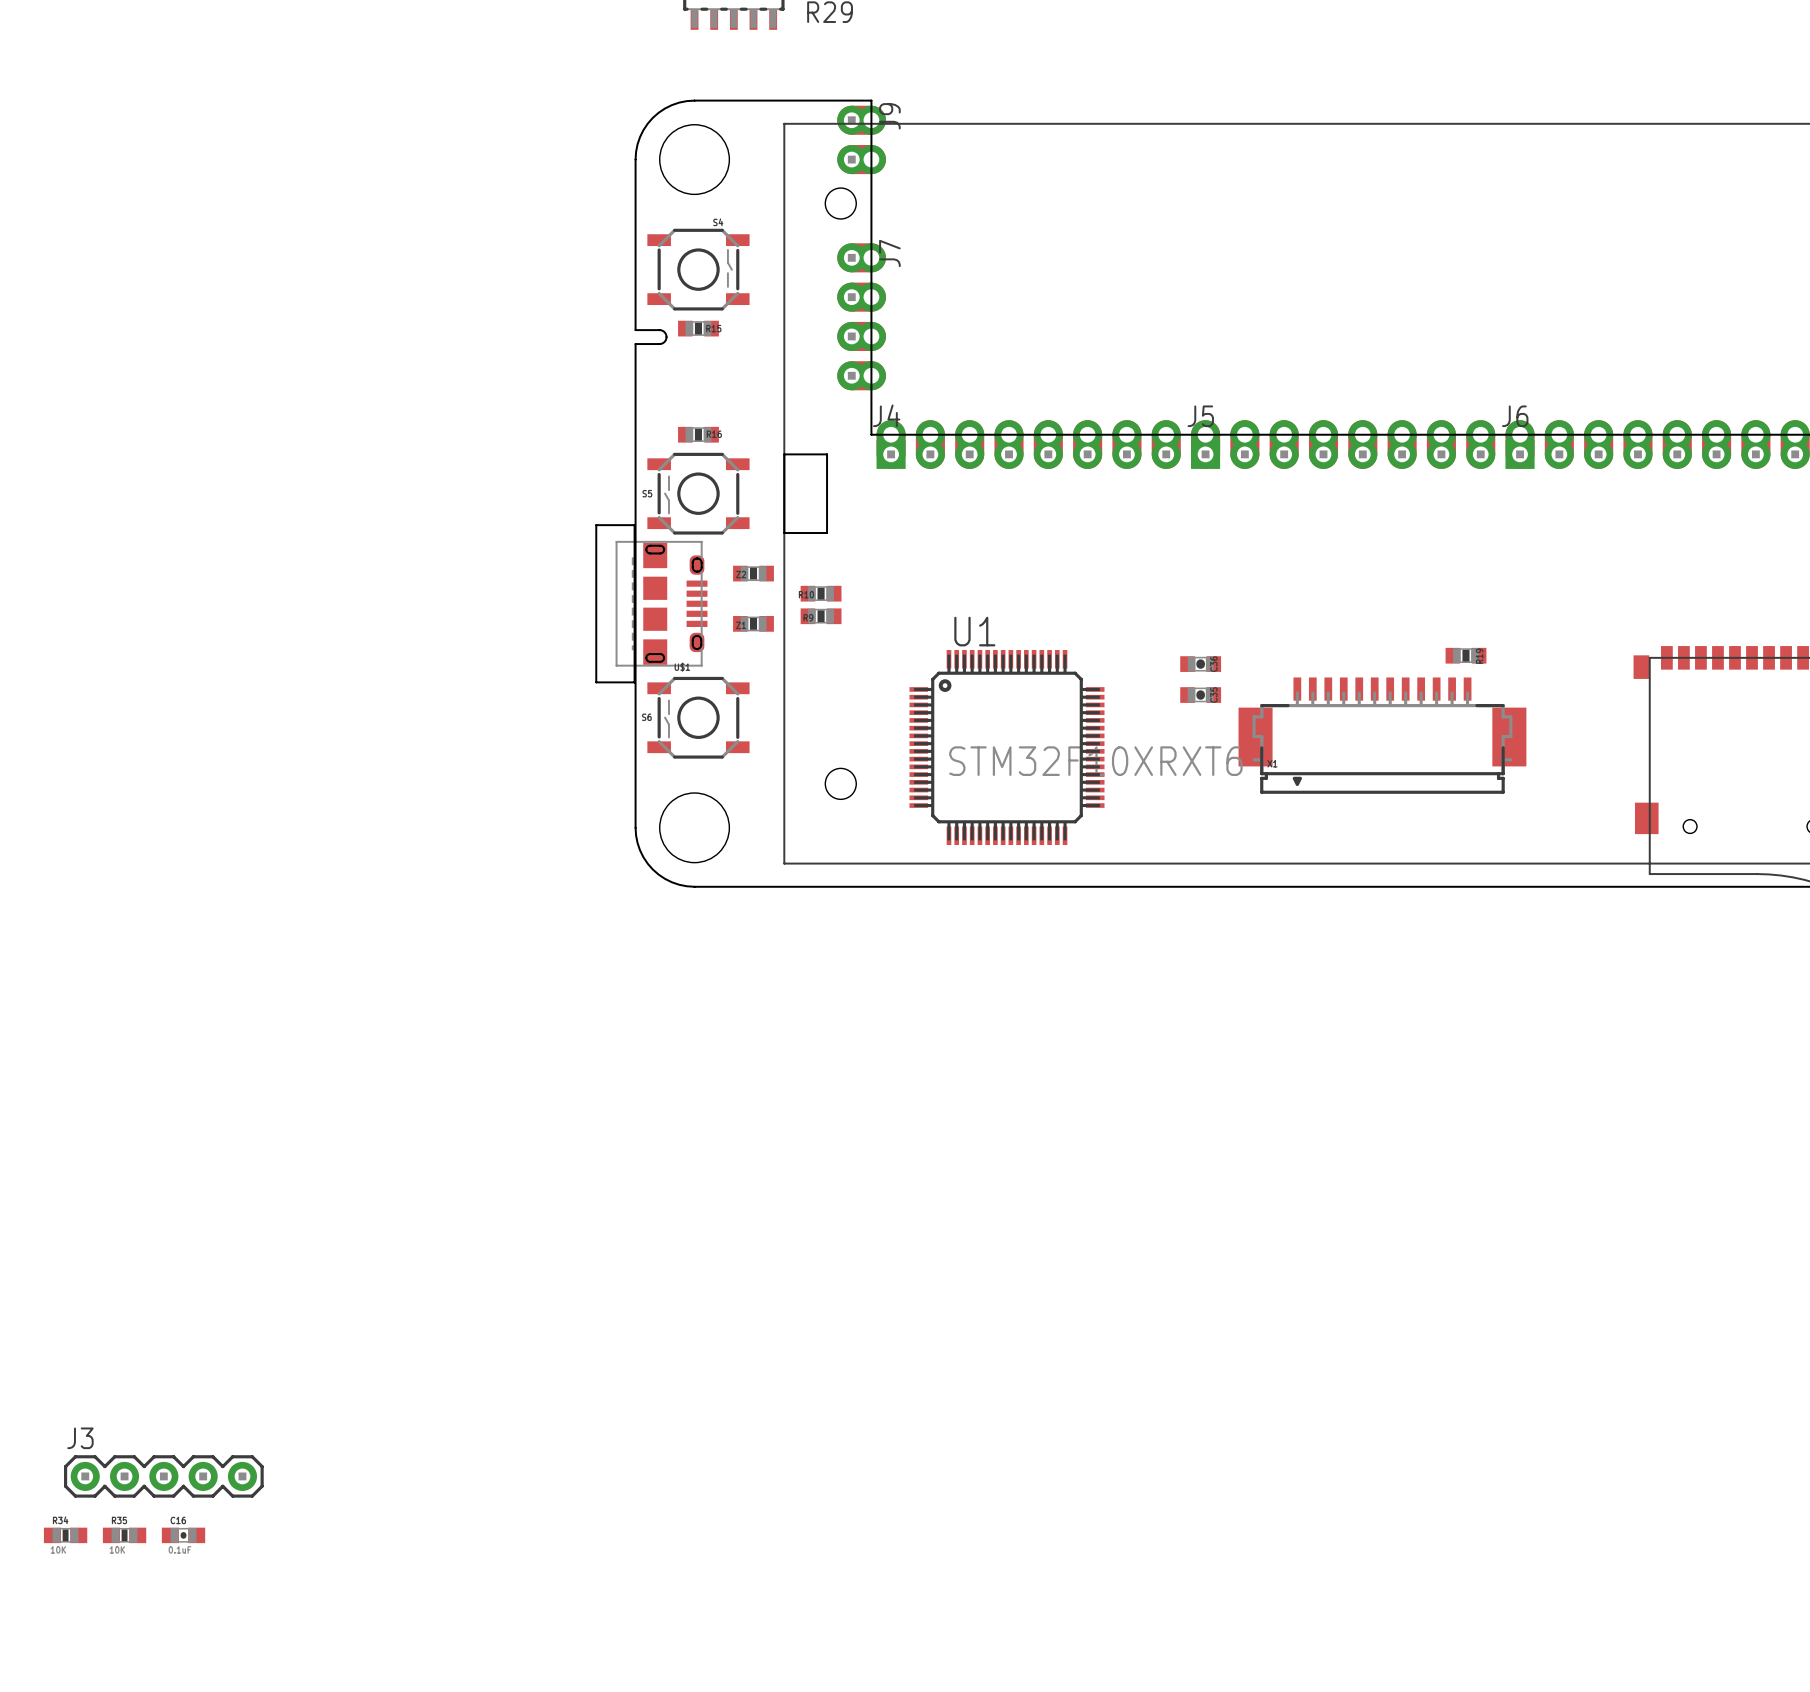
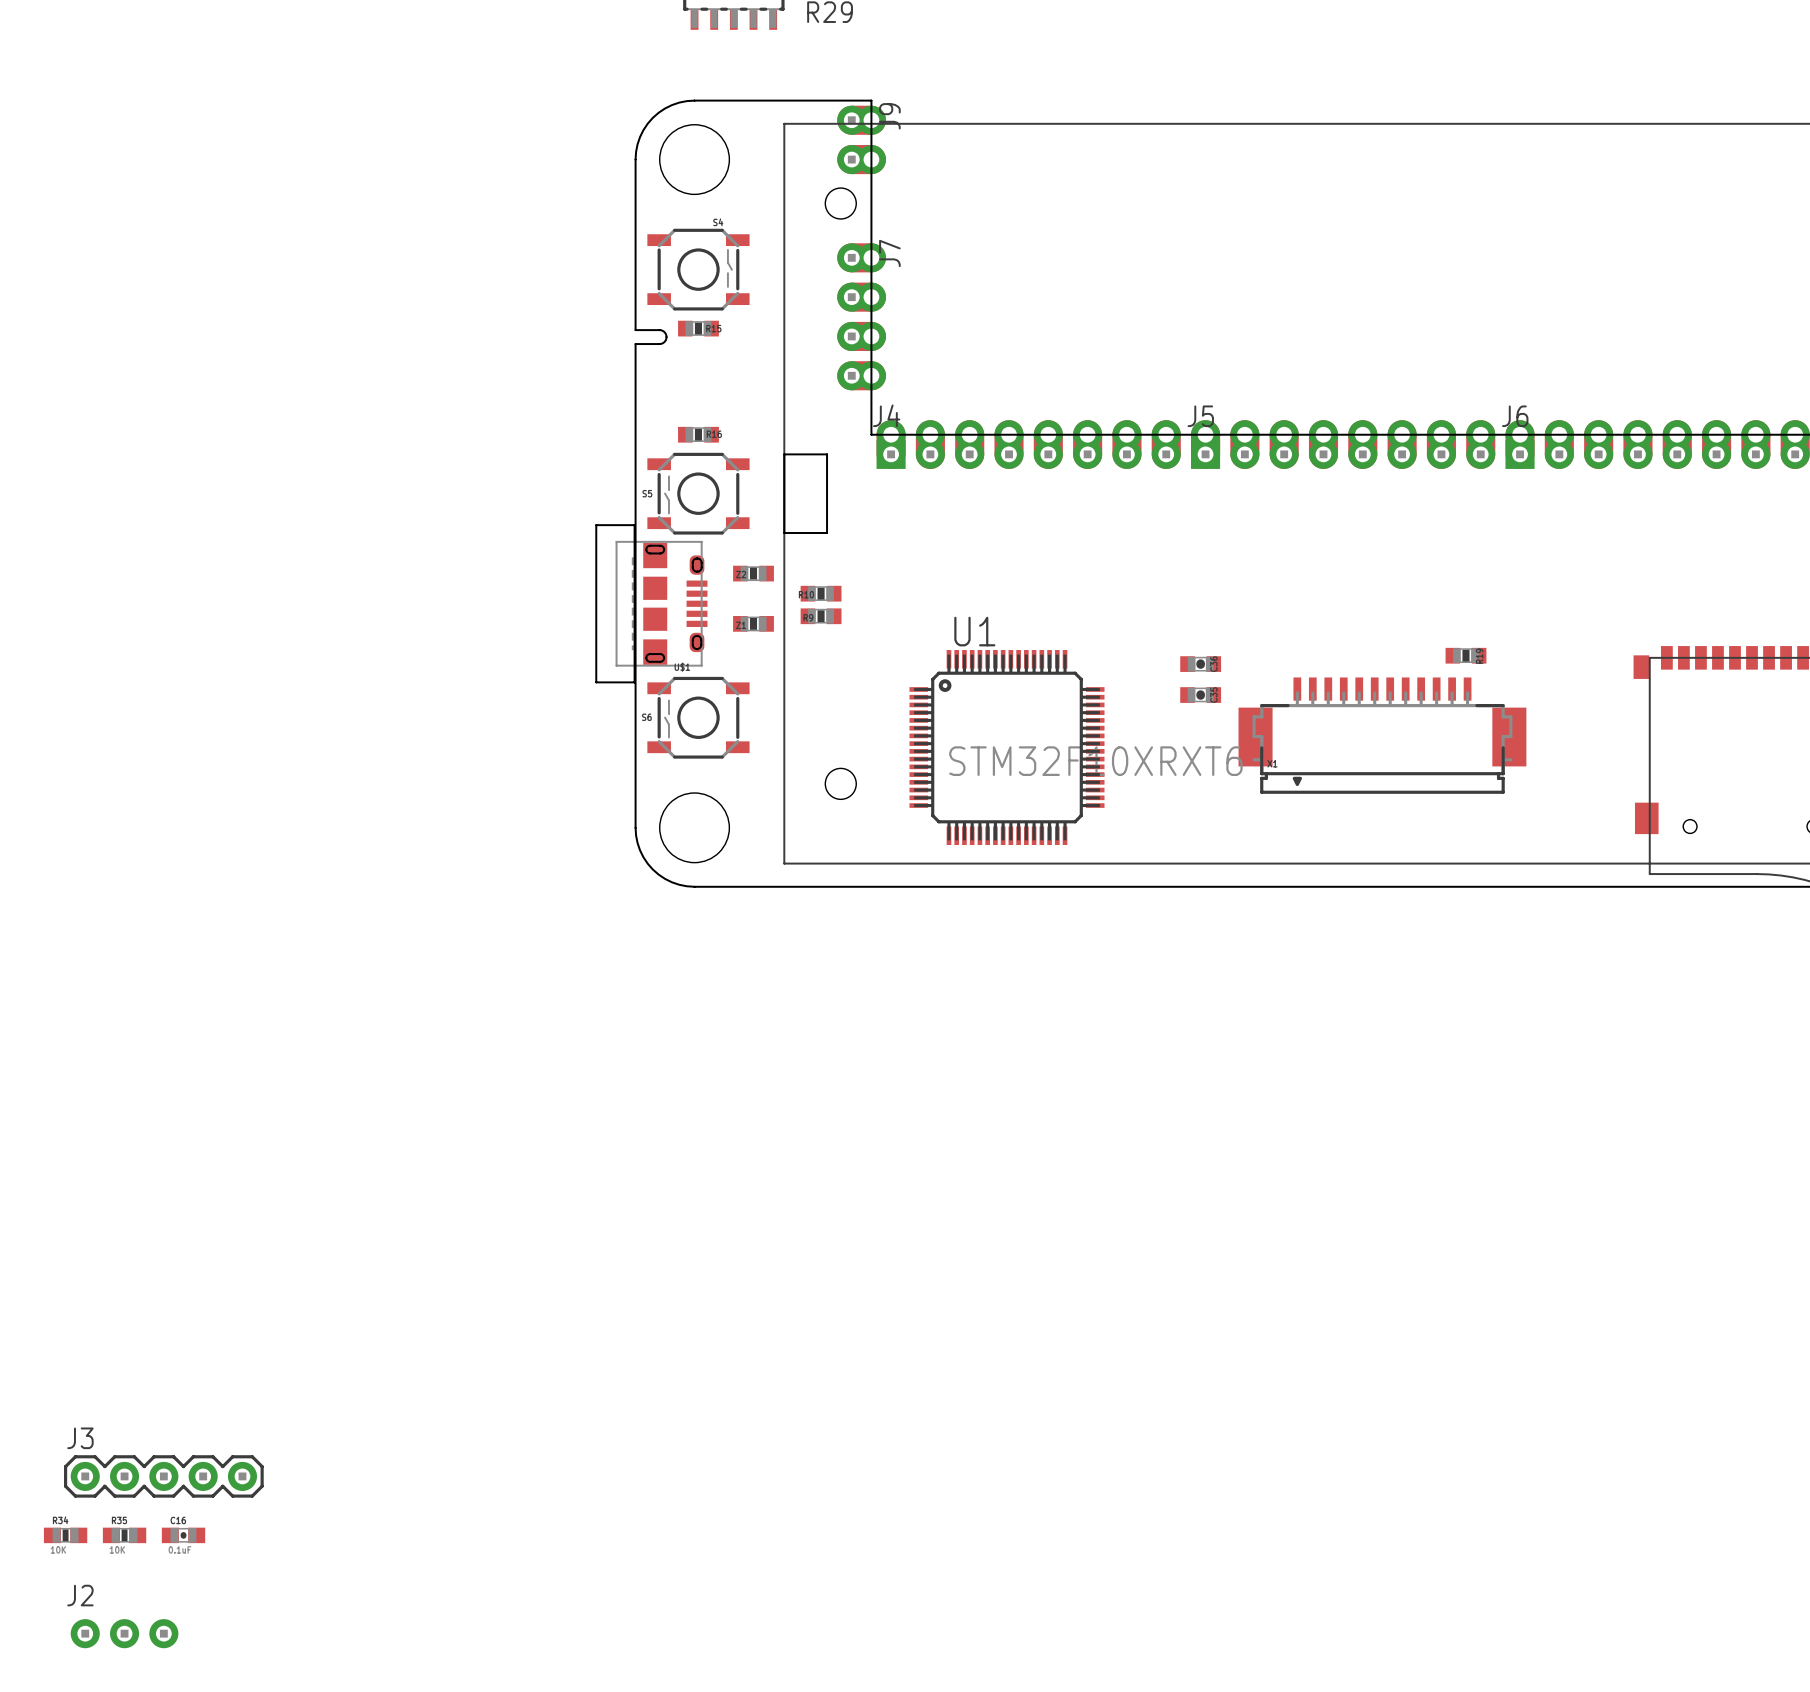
J2: none -> (124, 1633)

